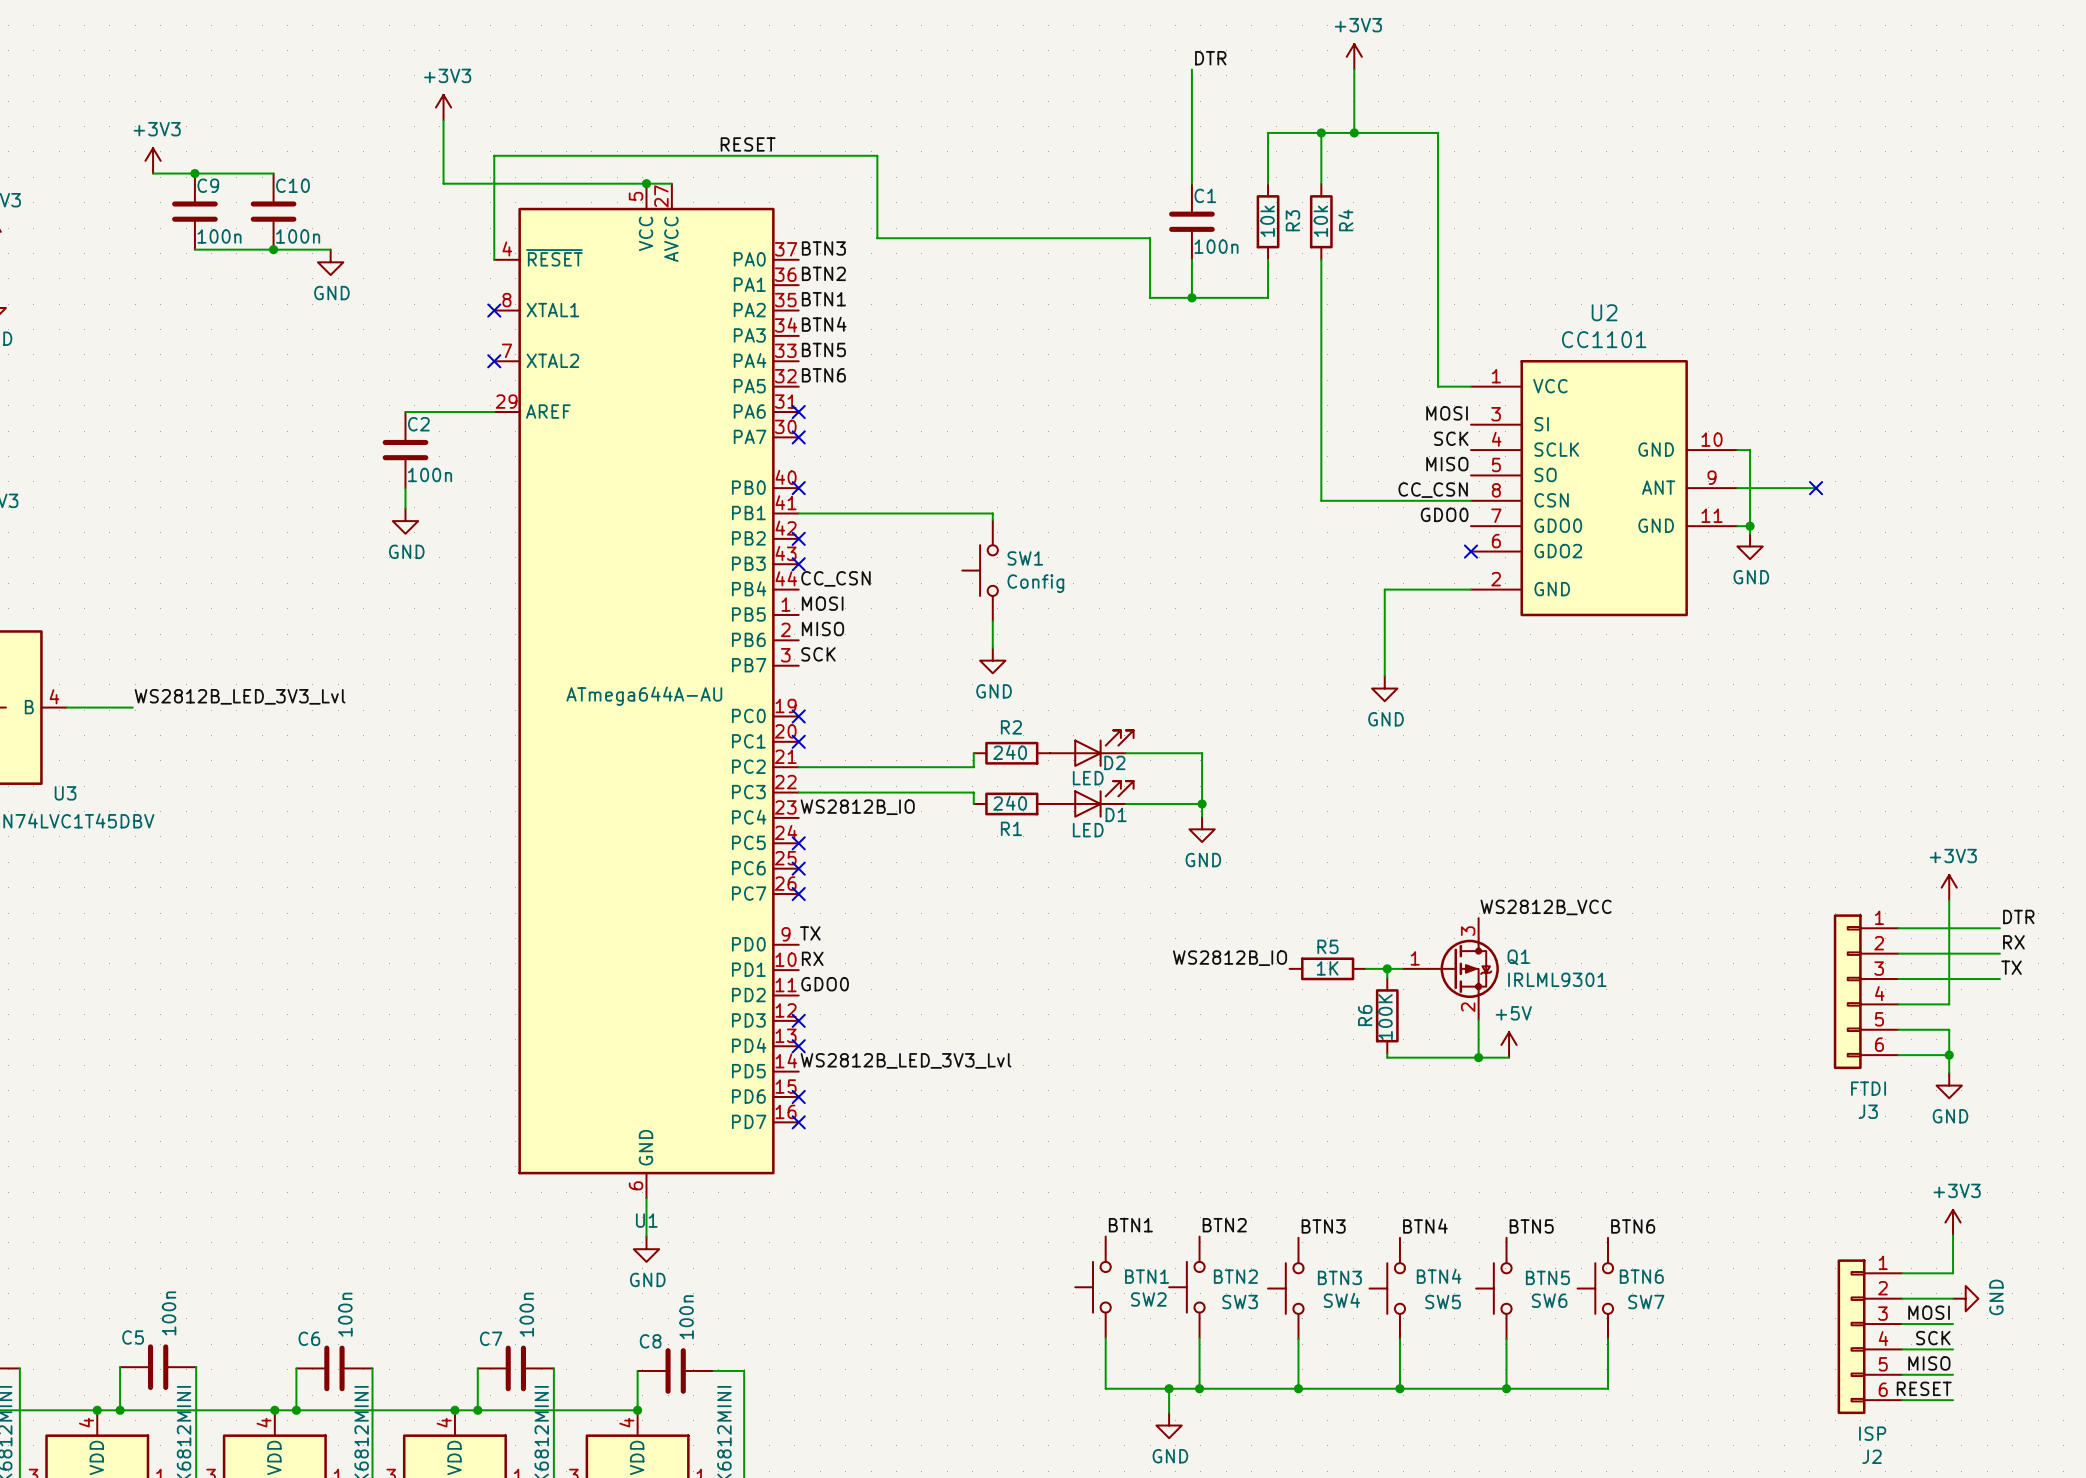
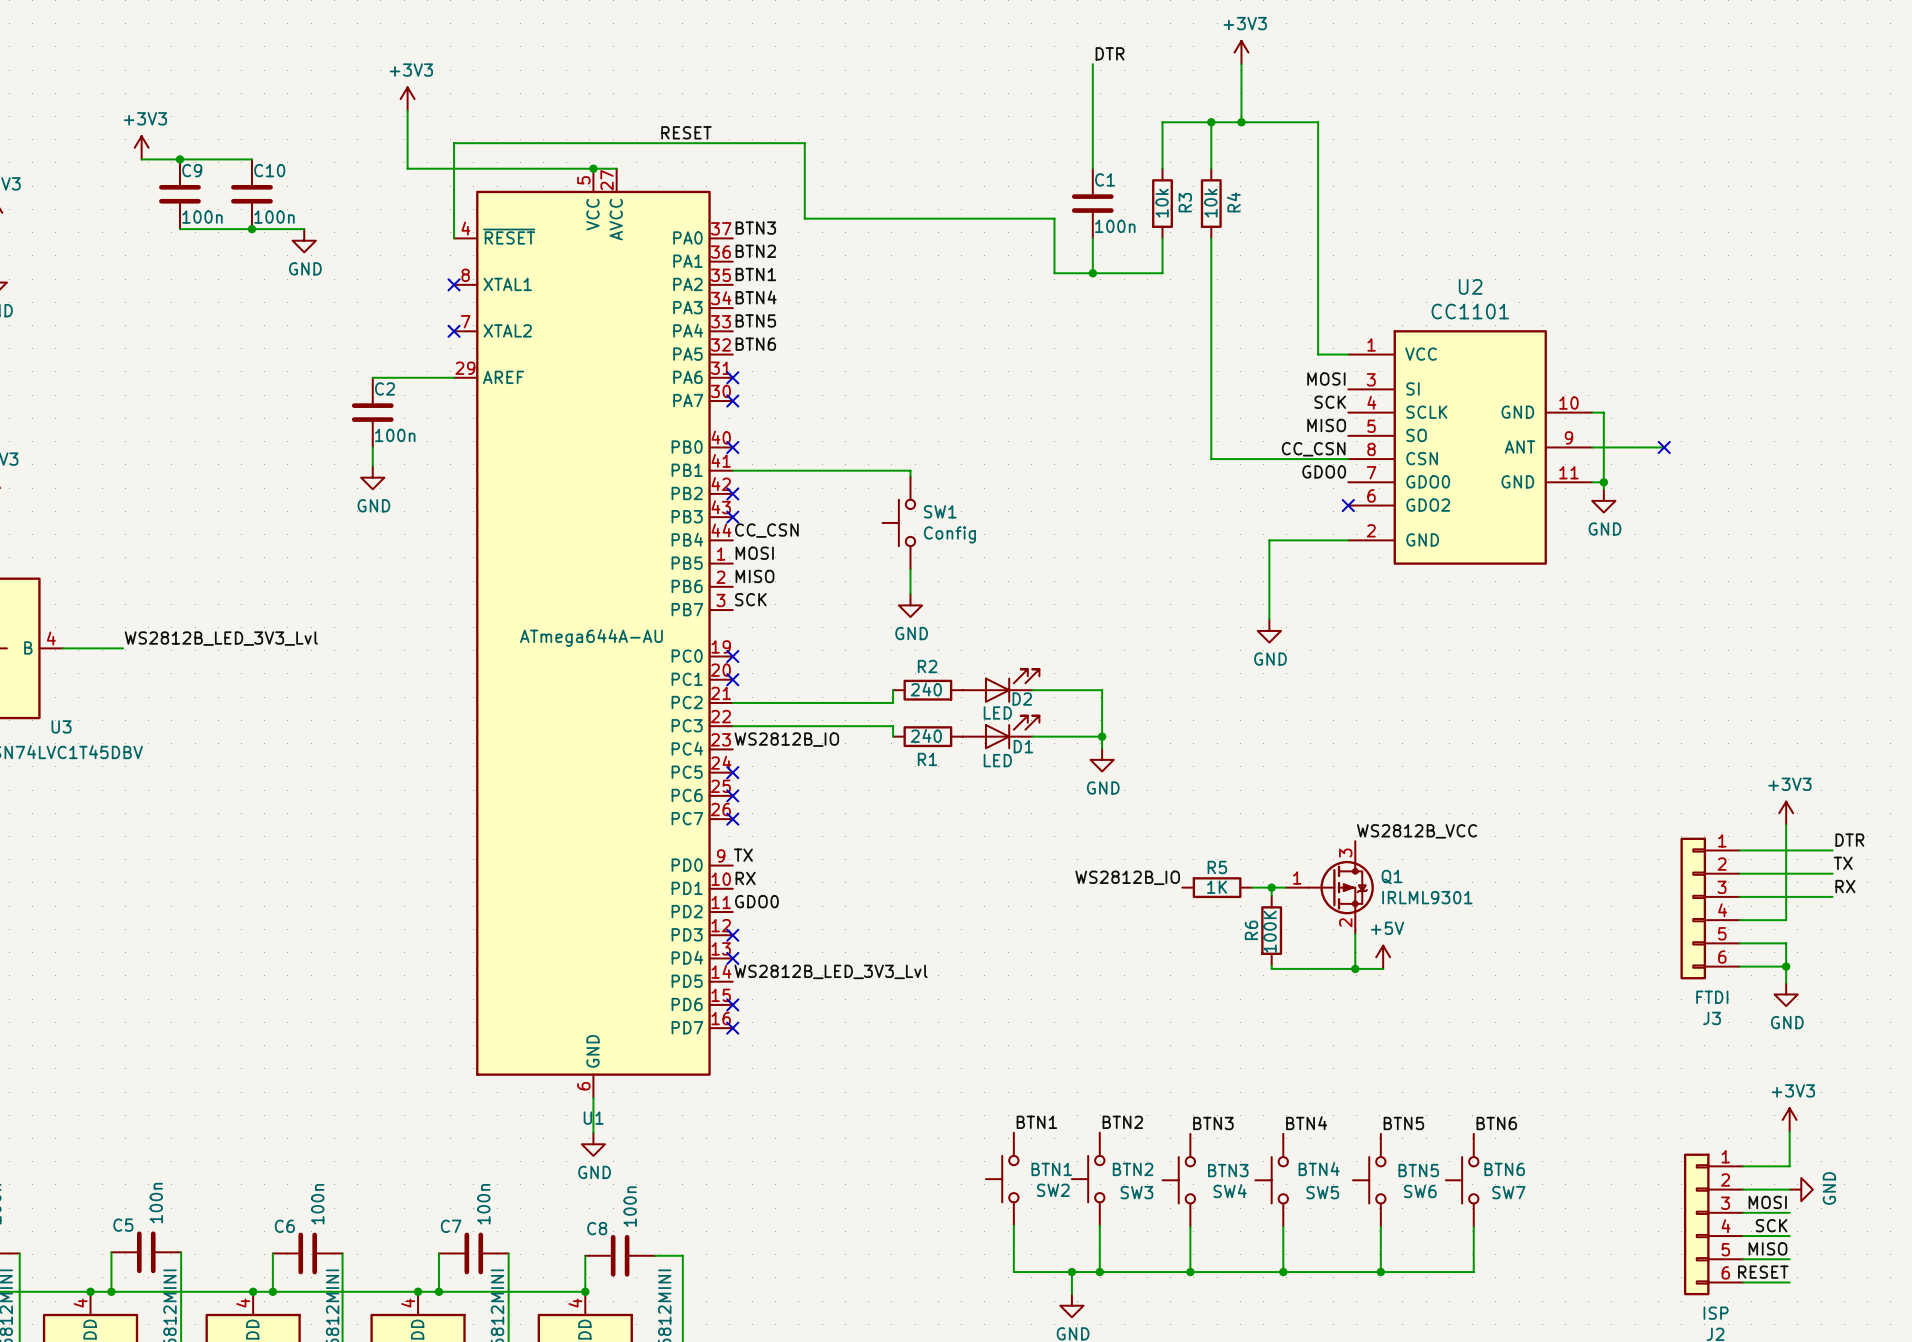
label: RX (2013, 942) -> TX (1843, 863)
label: TX (2011, 967) -> RX (1845, 886)

